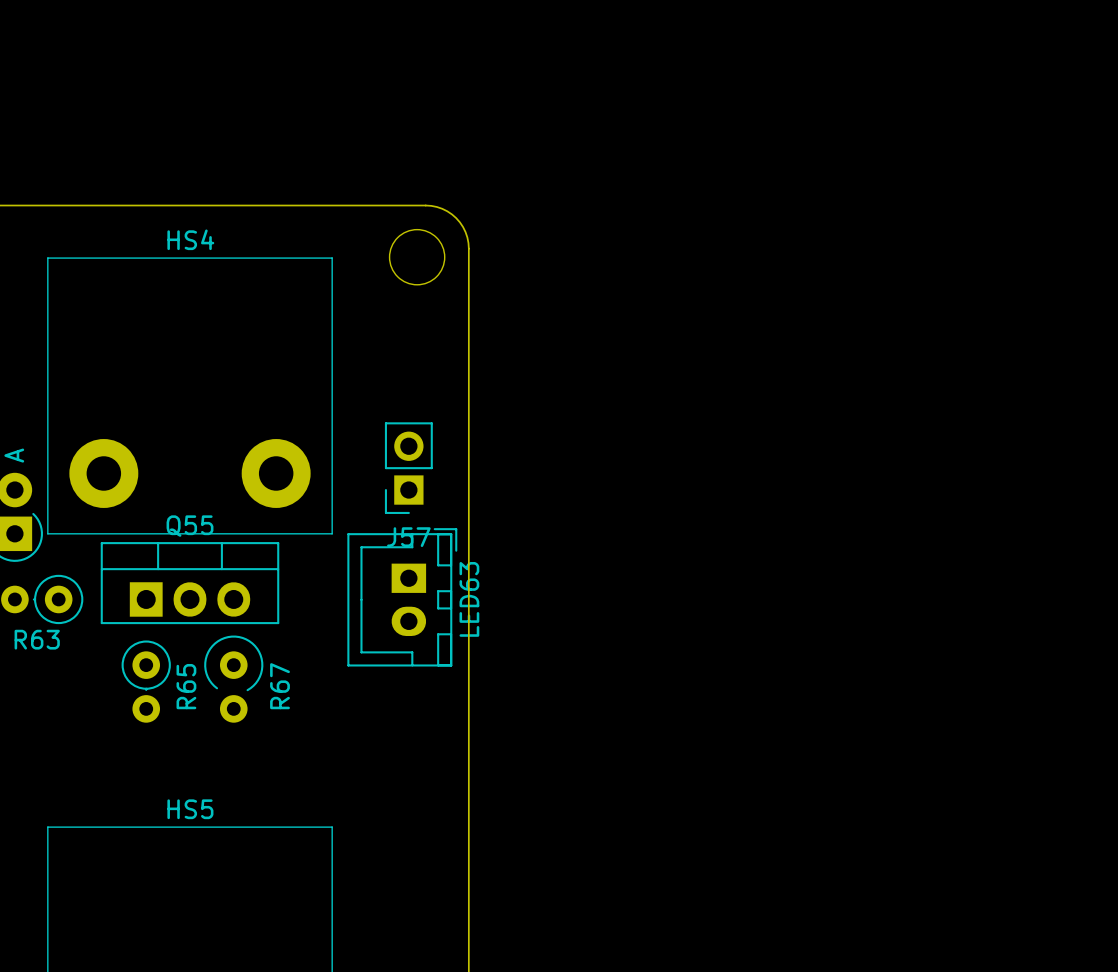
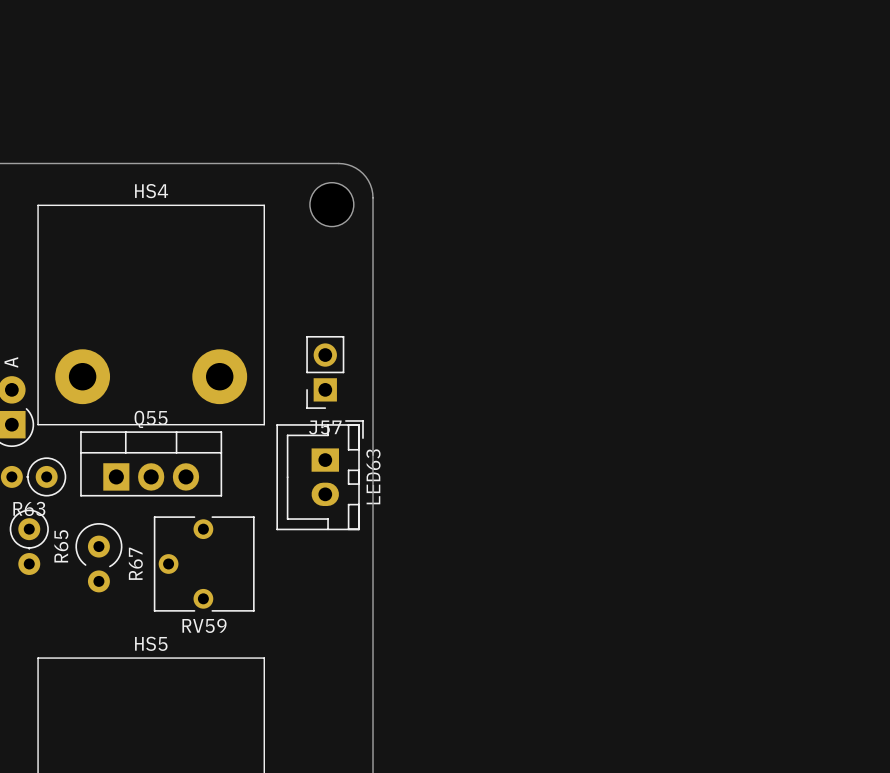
R67 position: (233, 679) -> (98, 557)
R65 position: (146, 681) -> (29, 542)
RV59: none -> (204, 563)

